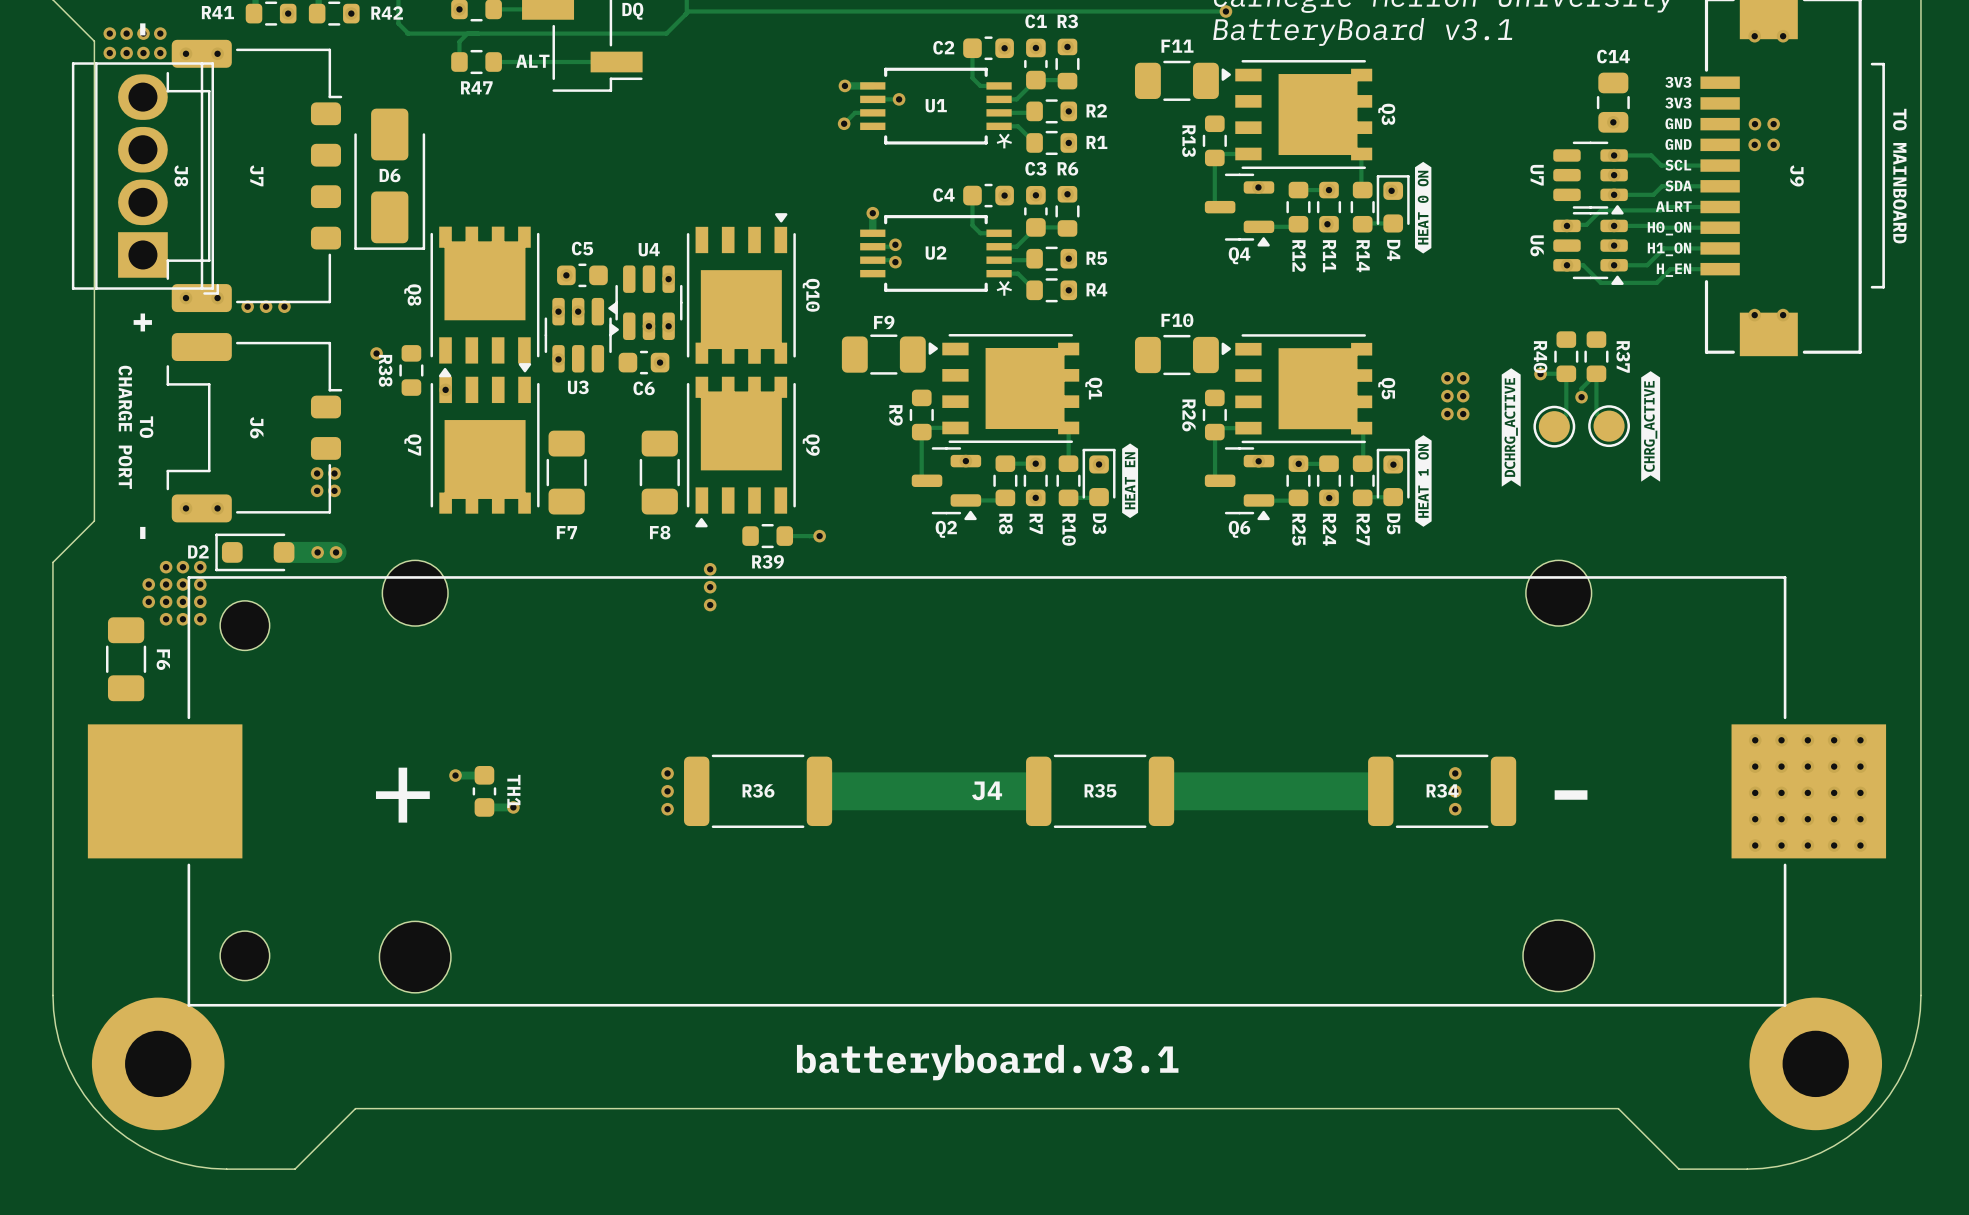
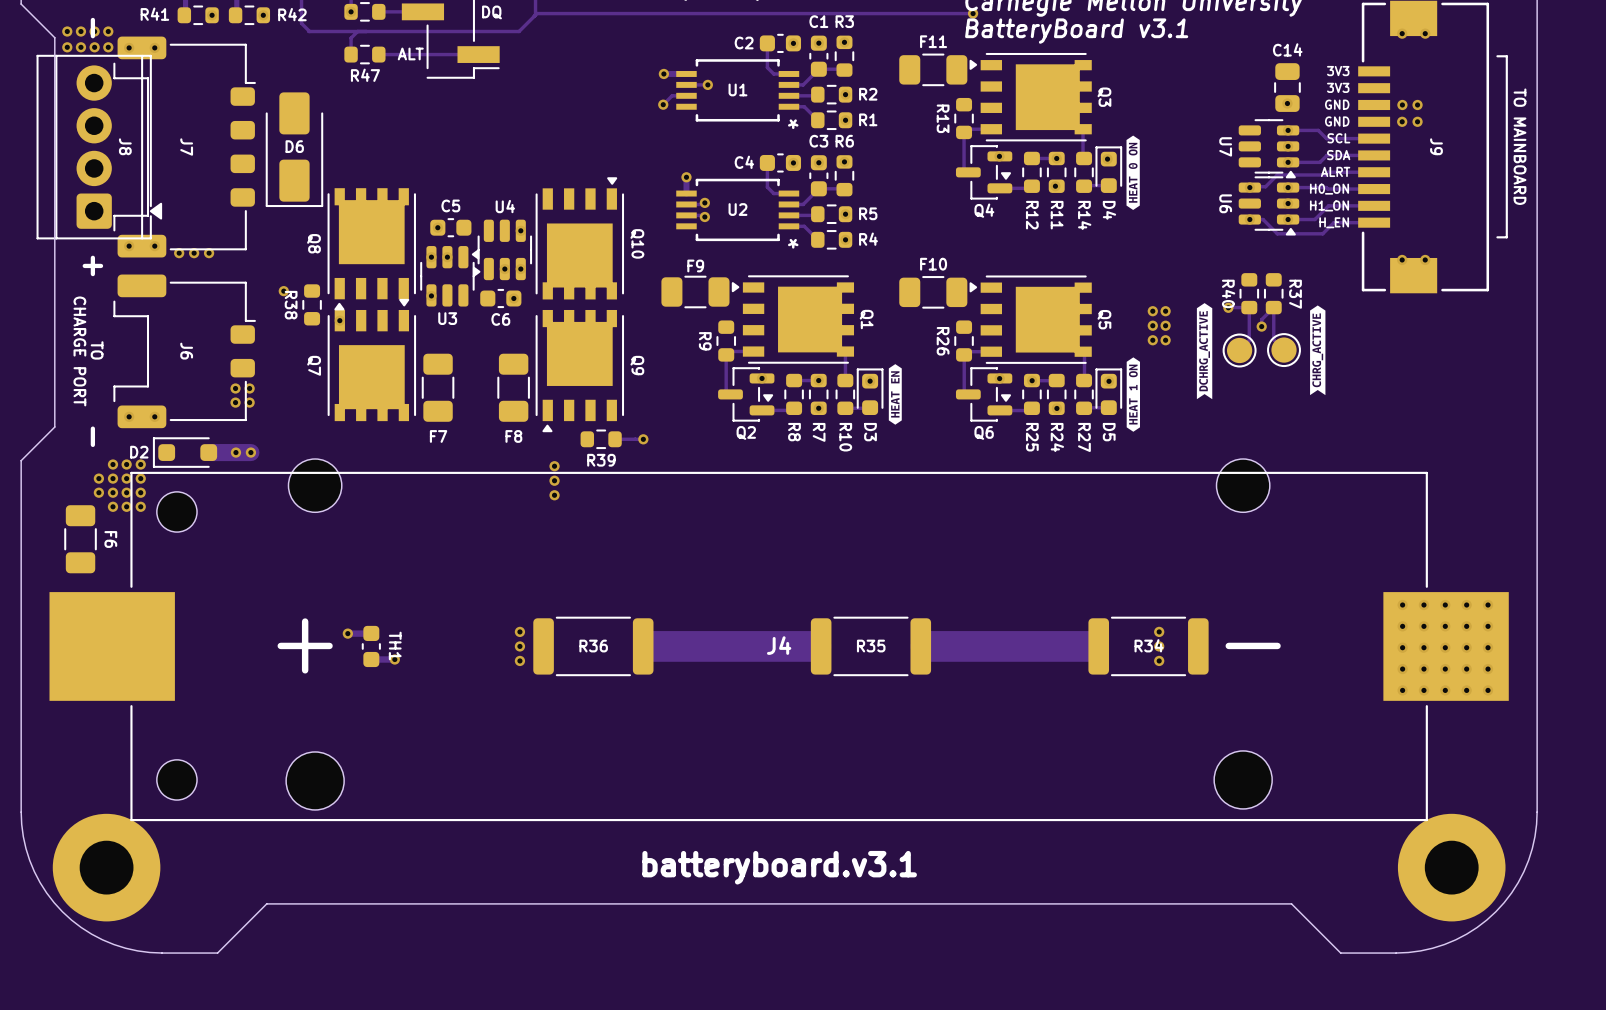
J8 footprint: [71, 62, 219, 295] -> [36, 54, 163, 240]
Q4 footprint: [1204, 173, 1275, 247] -> [955, 145, 1013, 200]
Q2 footprint: [911, 447, 982, 521] -> [718, 367, 775, 422]
Q6 footprint: [1204, 447, 1275, 521] -> [955, 367, 1013, 422]

